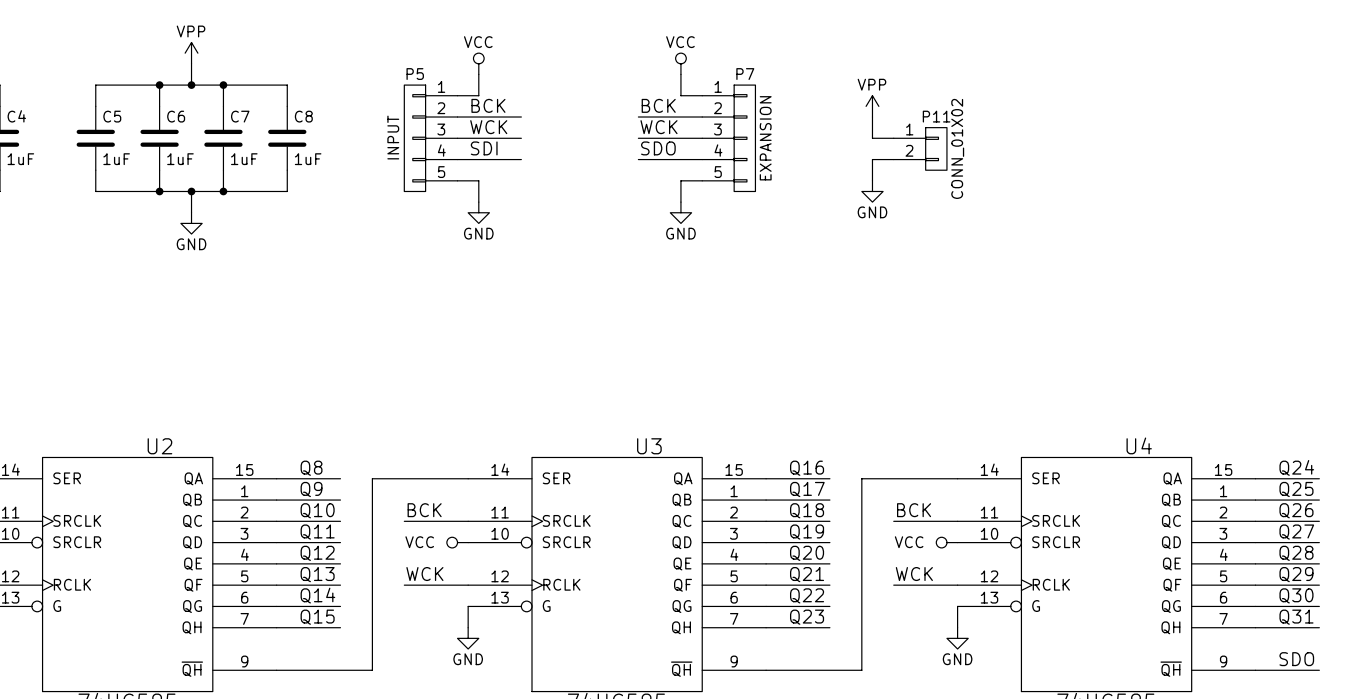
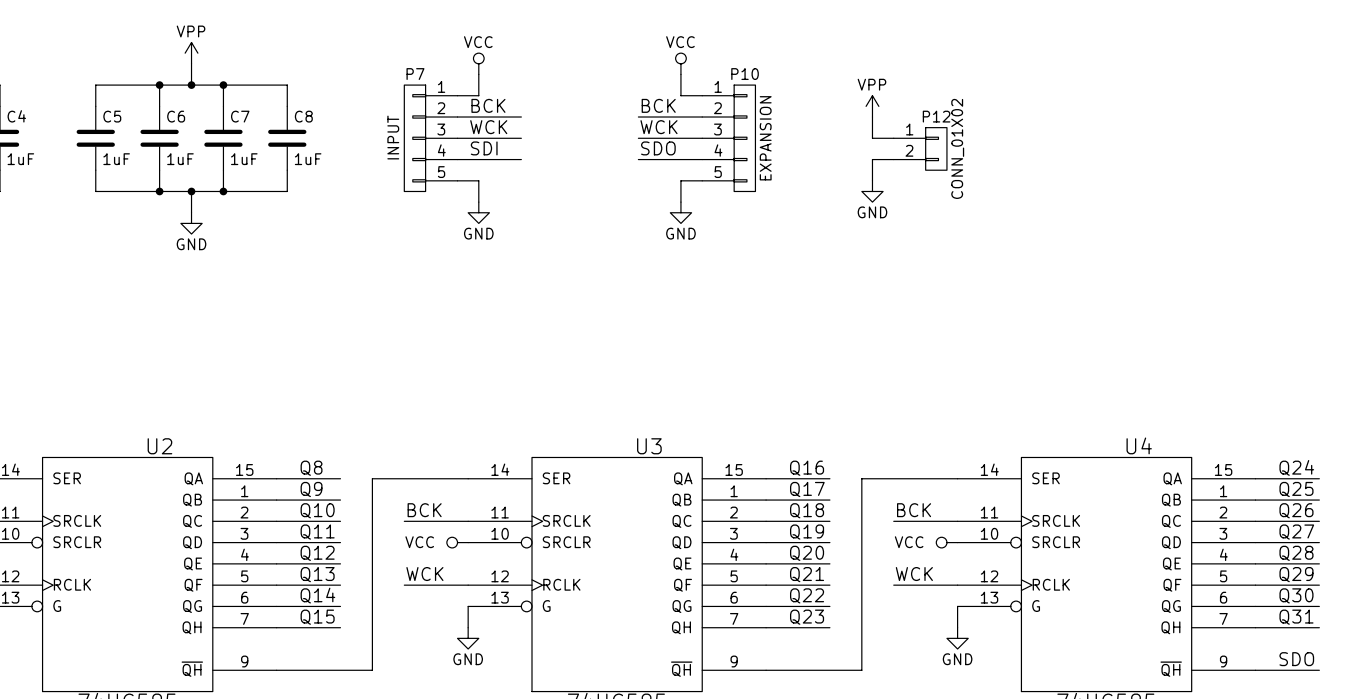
P5 name: P5 (415, 74) -> P7 (415, 74)
P7 name: P7 (745, 74) -> P10 (745, 74)
P11 name: P11 (936, 116) -> P12 (936, 116)

